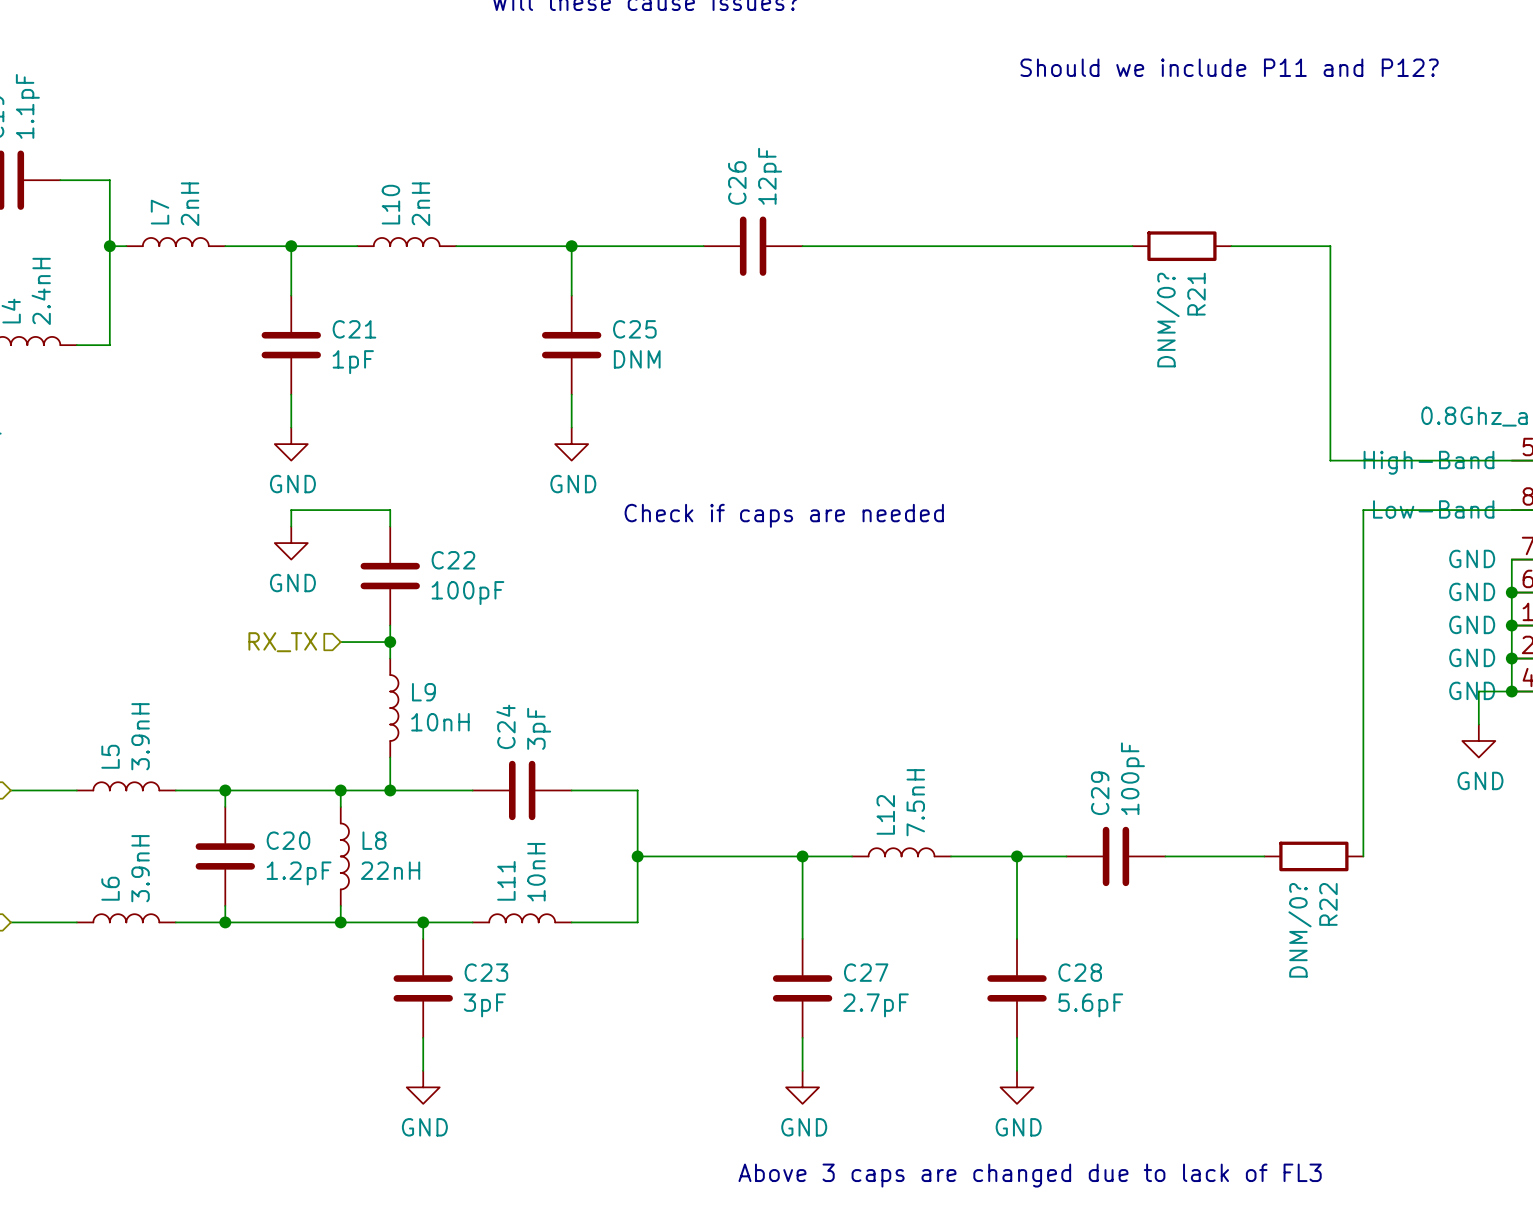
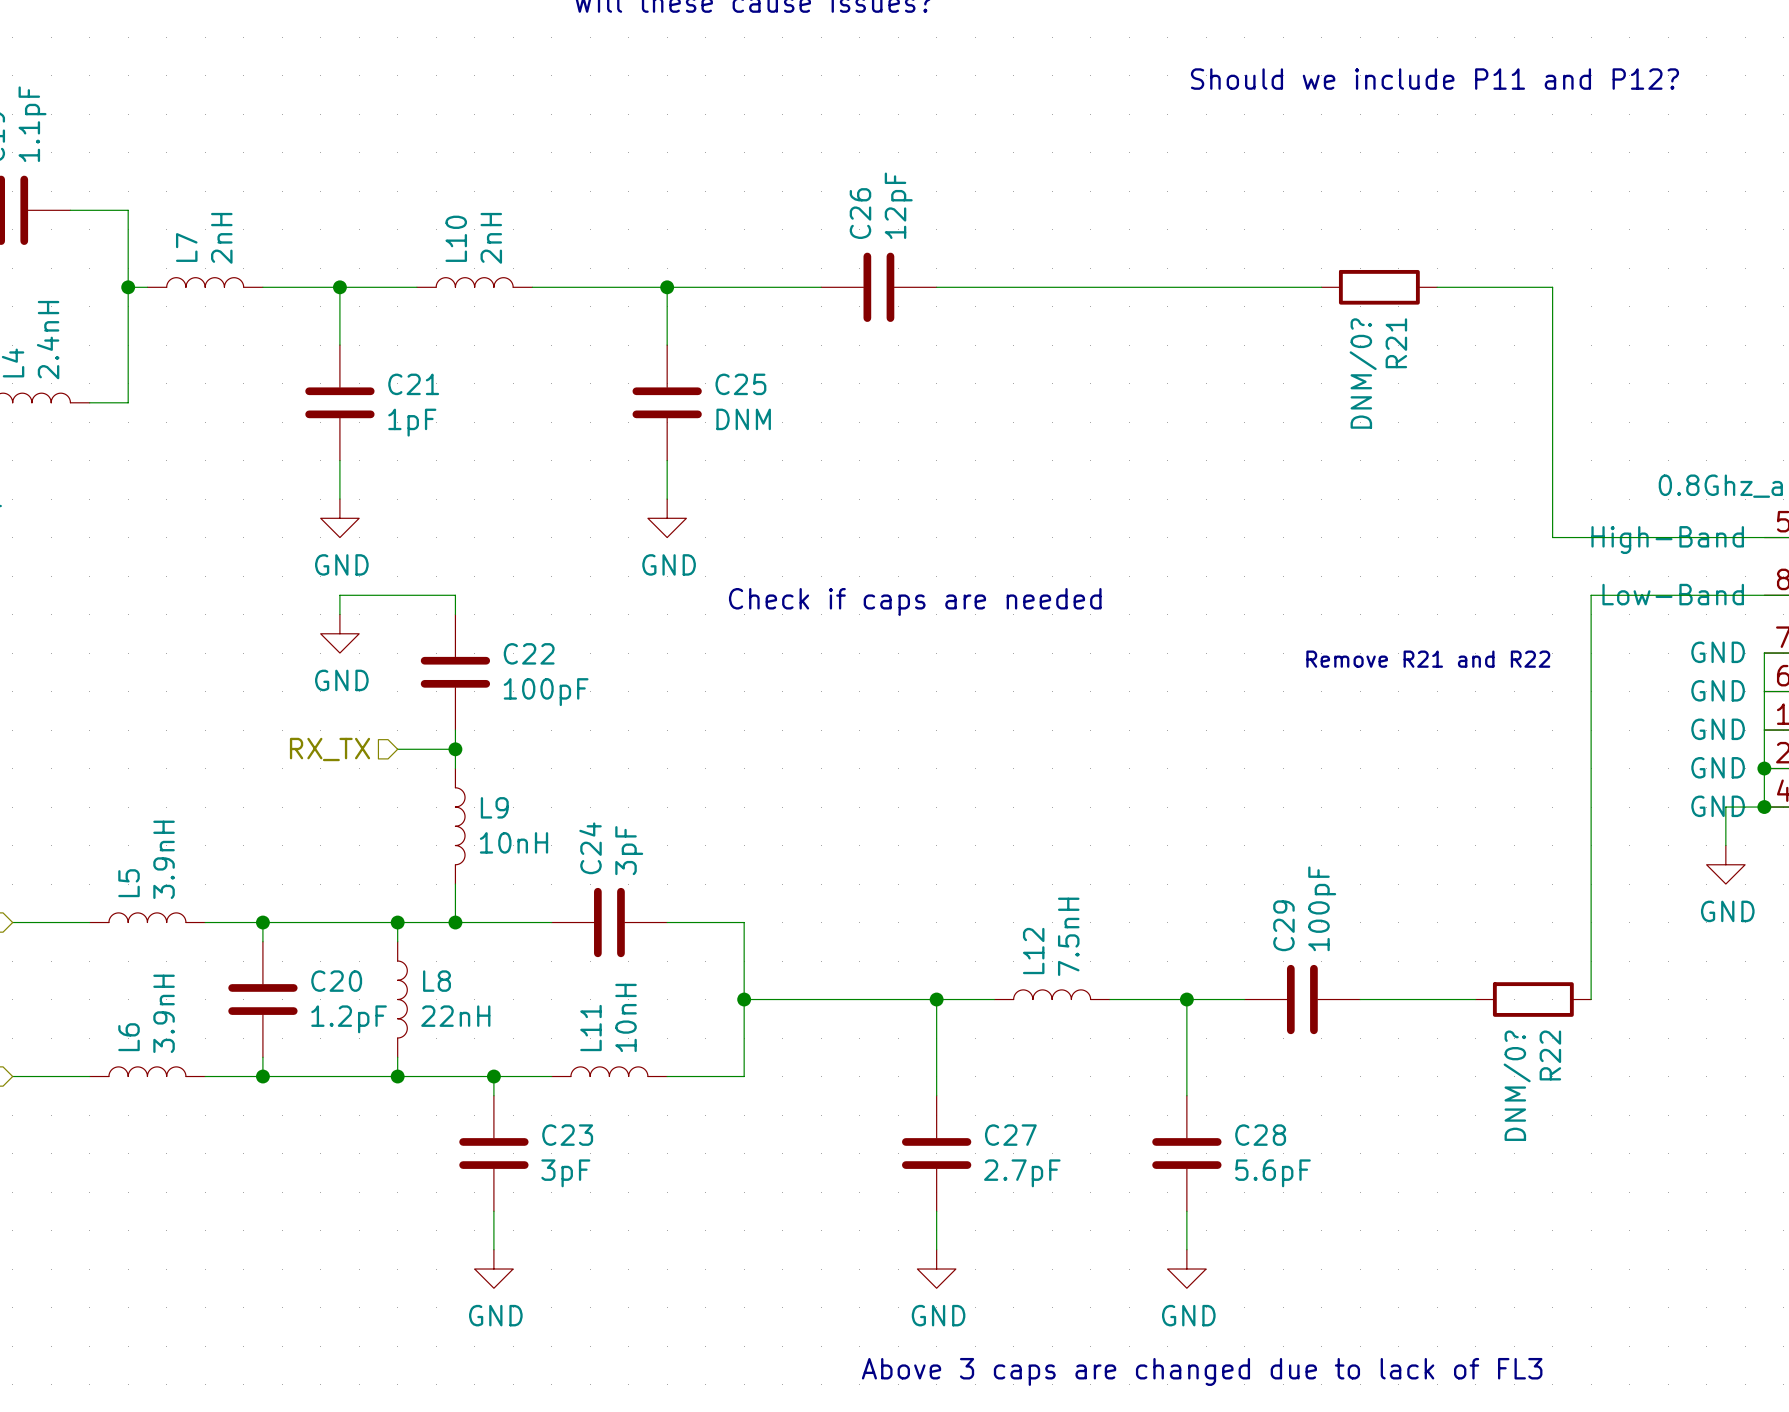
text: none -> Remove R21 and R22 (1428, 659)
junction: (1511, 592) -> none
junction: (1511, 625) -> none

